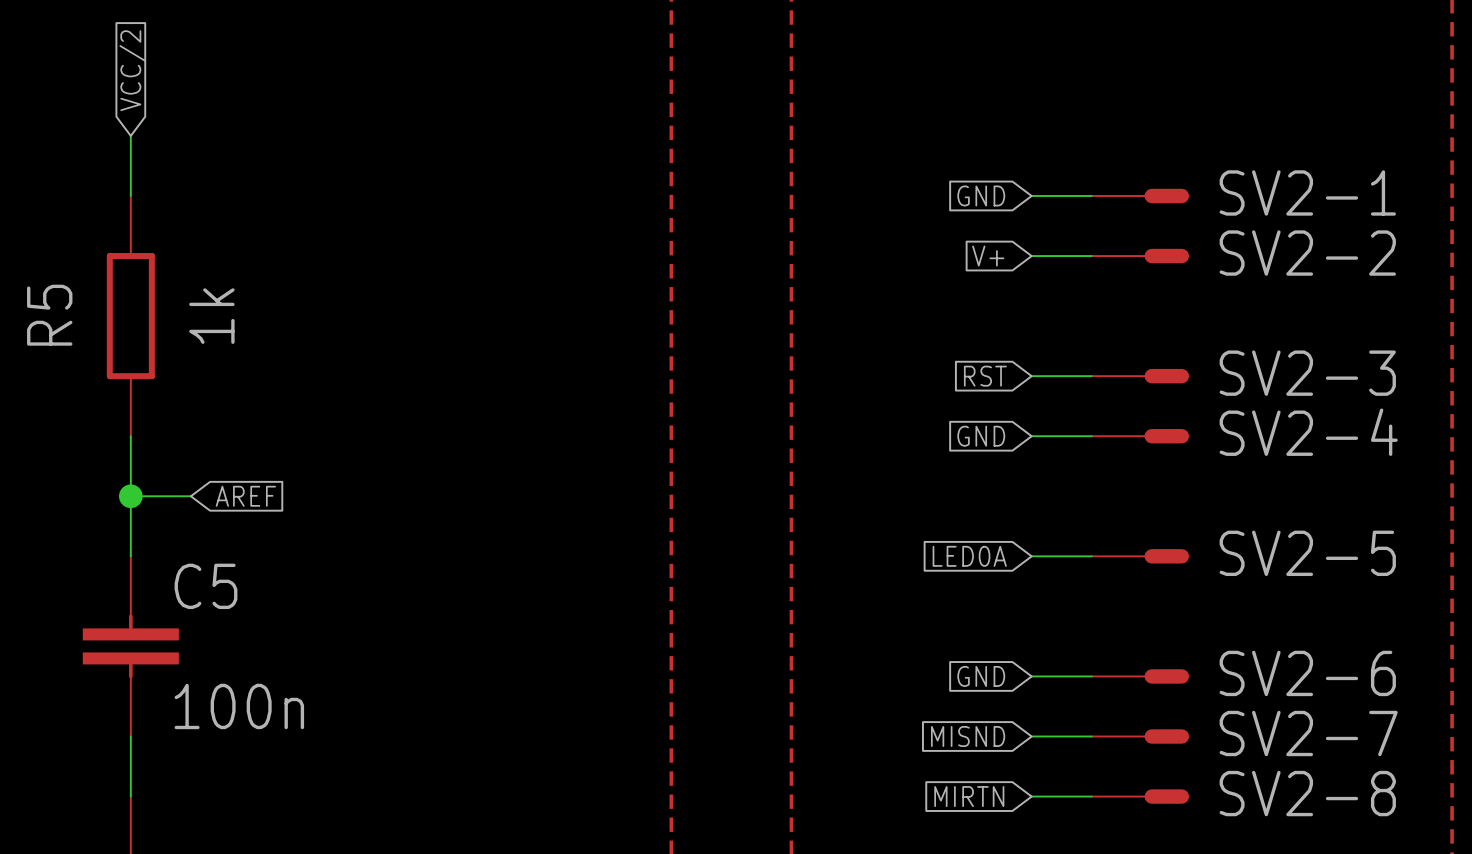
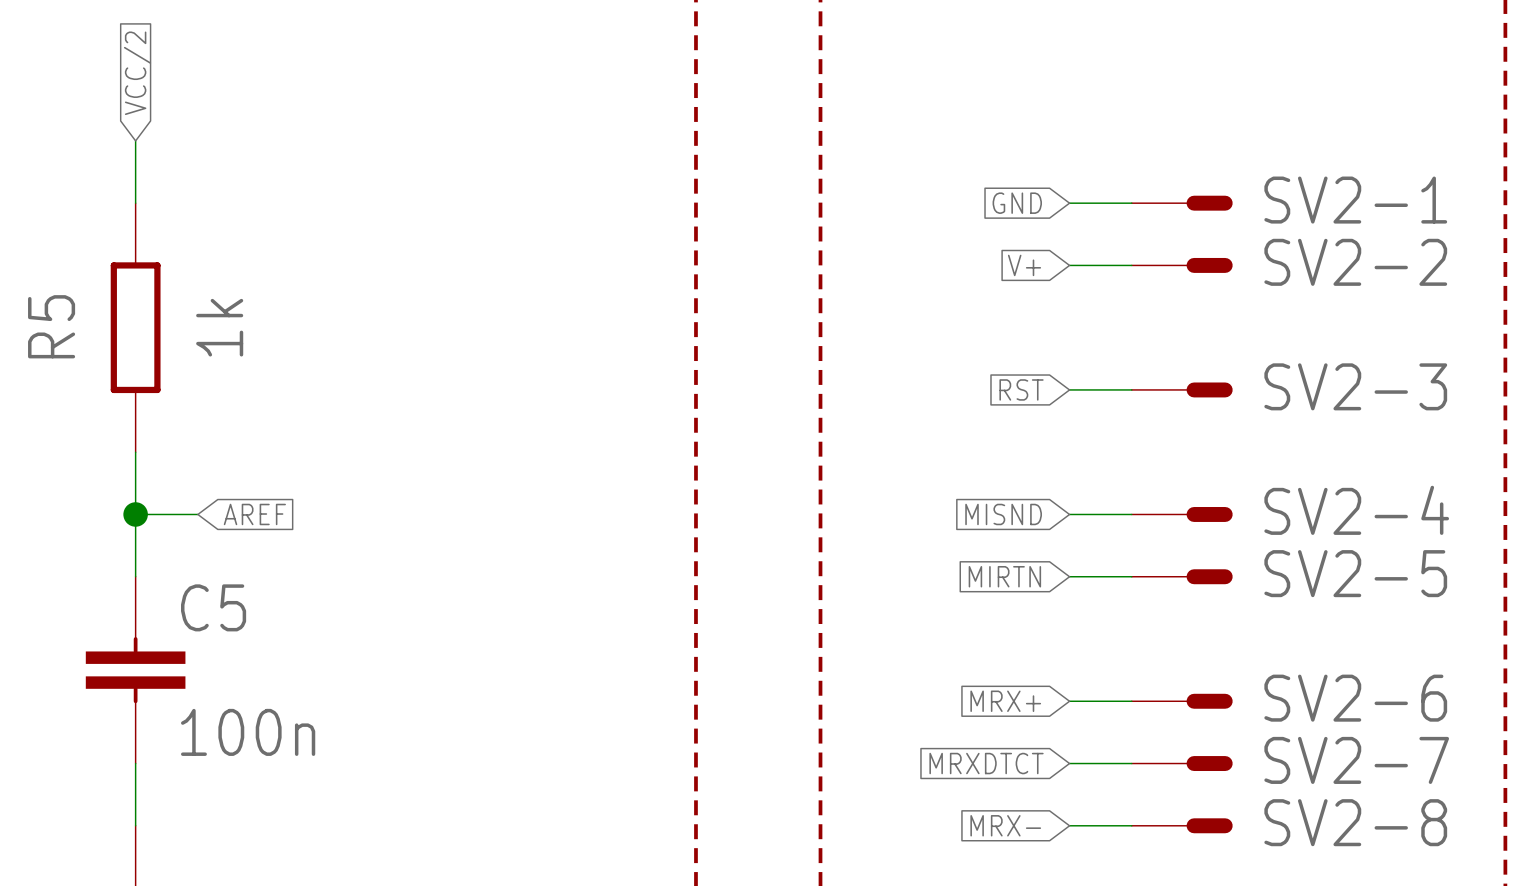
global label: GND (981, 436) -> none
wire: (1031, 436) (1091, 436) -> (1069, 514) (1131, 514)
SV2-4 position: (1140, 436) -> (1182, 514)
global label: none -> MISND (1003, 514)
global label: LED0A (969, 556) -> MIRTN (1004, 576)
global label: GND (981, 676) -> MRX+ (1005, 701)
global label: MISND (968, 736) -> MRXDTCT (986, 763)
global label: MIRTN (969, 796) -> MRX- (1005, 825)

